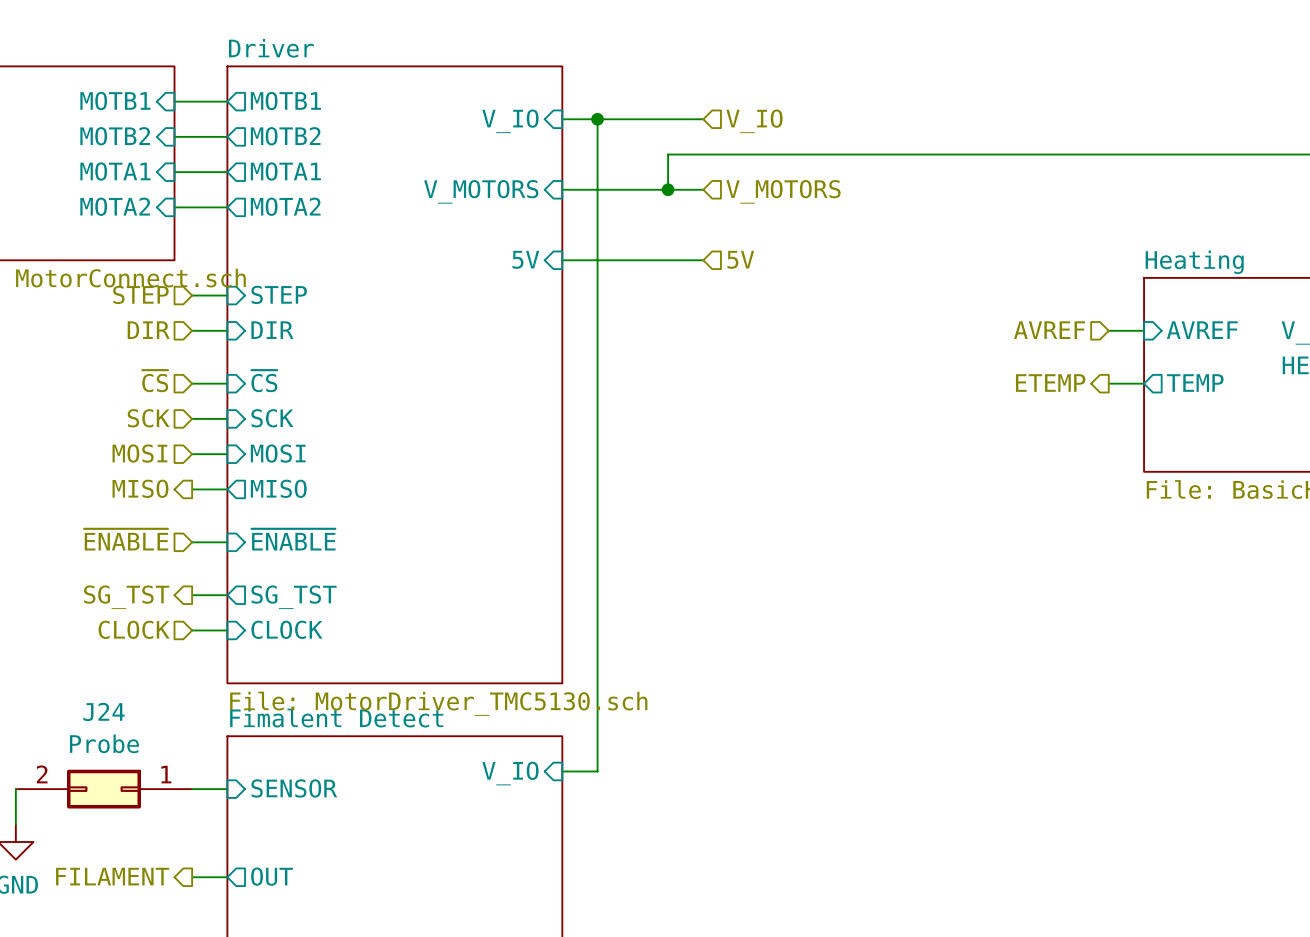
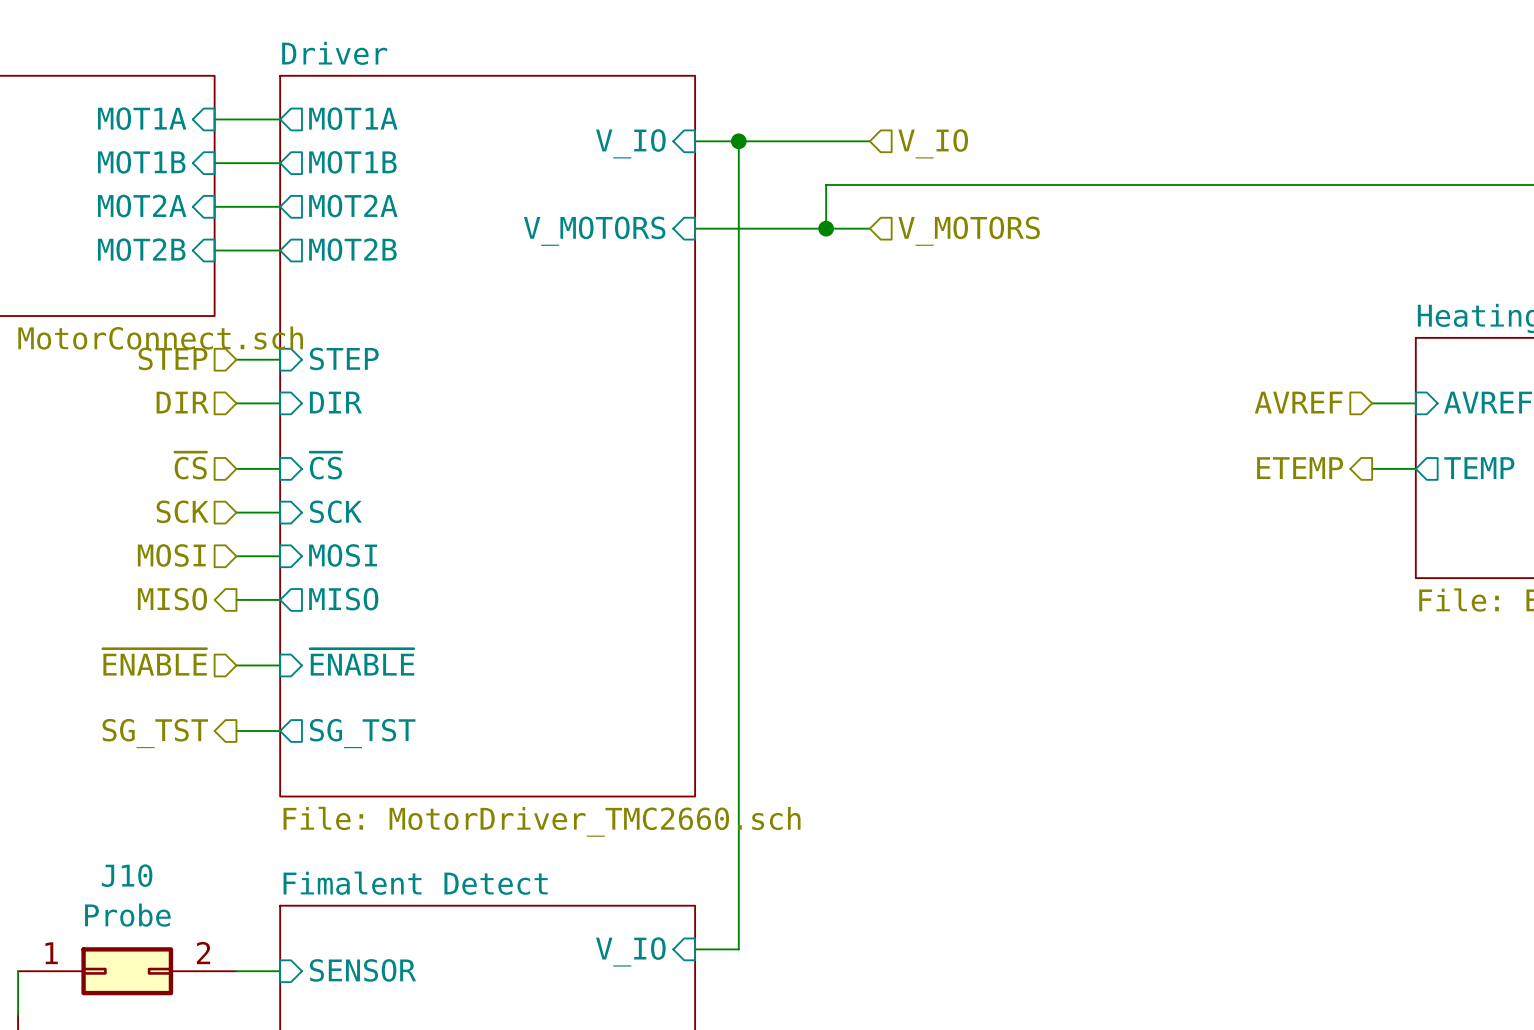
sheet pin: MOTB1 (115, 100) -> MOT1A (142, 118)
sheet pin: MOTB1 (285, 100) -> MOT1A (353, 118)
sheet pin: MOTB2 (115, 136) -> MOT1B (141, 162)
sheet pin: MOTB2 (285, 136) -> MOT1B (352, 162)
sheet pin: MOTA1 (115, 171) -> MOT2A (142, 206)
sheet pin: MOTA1 (285, 171) -> MOT2A (353, 206)
sheet pin: MOTA2 (115, 206) -> MOT2B (141, 249)
sheet pin: MOTA2 (285, 206) -> MOT2B (352, 249)
sheet pin: 5V (525, 259) -> none
hierarchical label: 5V (740, 259) -> none
wire: (562, 260) (703, 260) -> none
sheet Driver: none -> File: MotorDriver_TMC2660.sch (487, 436)
sheet Driver: File: MotorDriver_TMC5130.sch (394, 374) -> none
hierarchical label: CLOCK (134, 629) -> none
sheet pin: CLOCK (286, 629) -> none
wire: (192, 630) (227, 630) -> none
J24 name: J24 (104, 711) -> J10 (127, 875)
J24 rotation: 0° (104, 789) -> 180° (127, 971)

